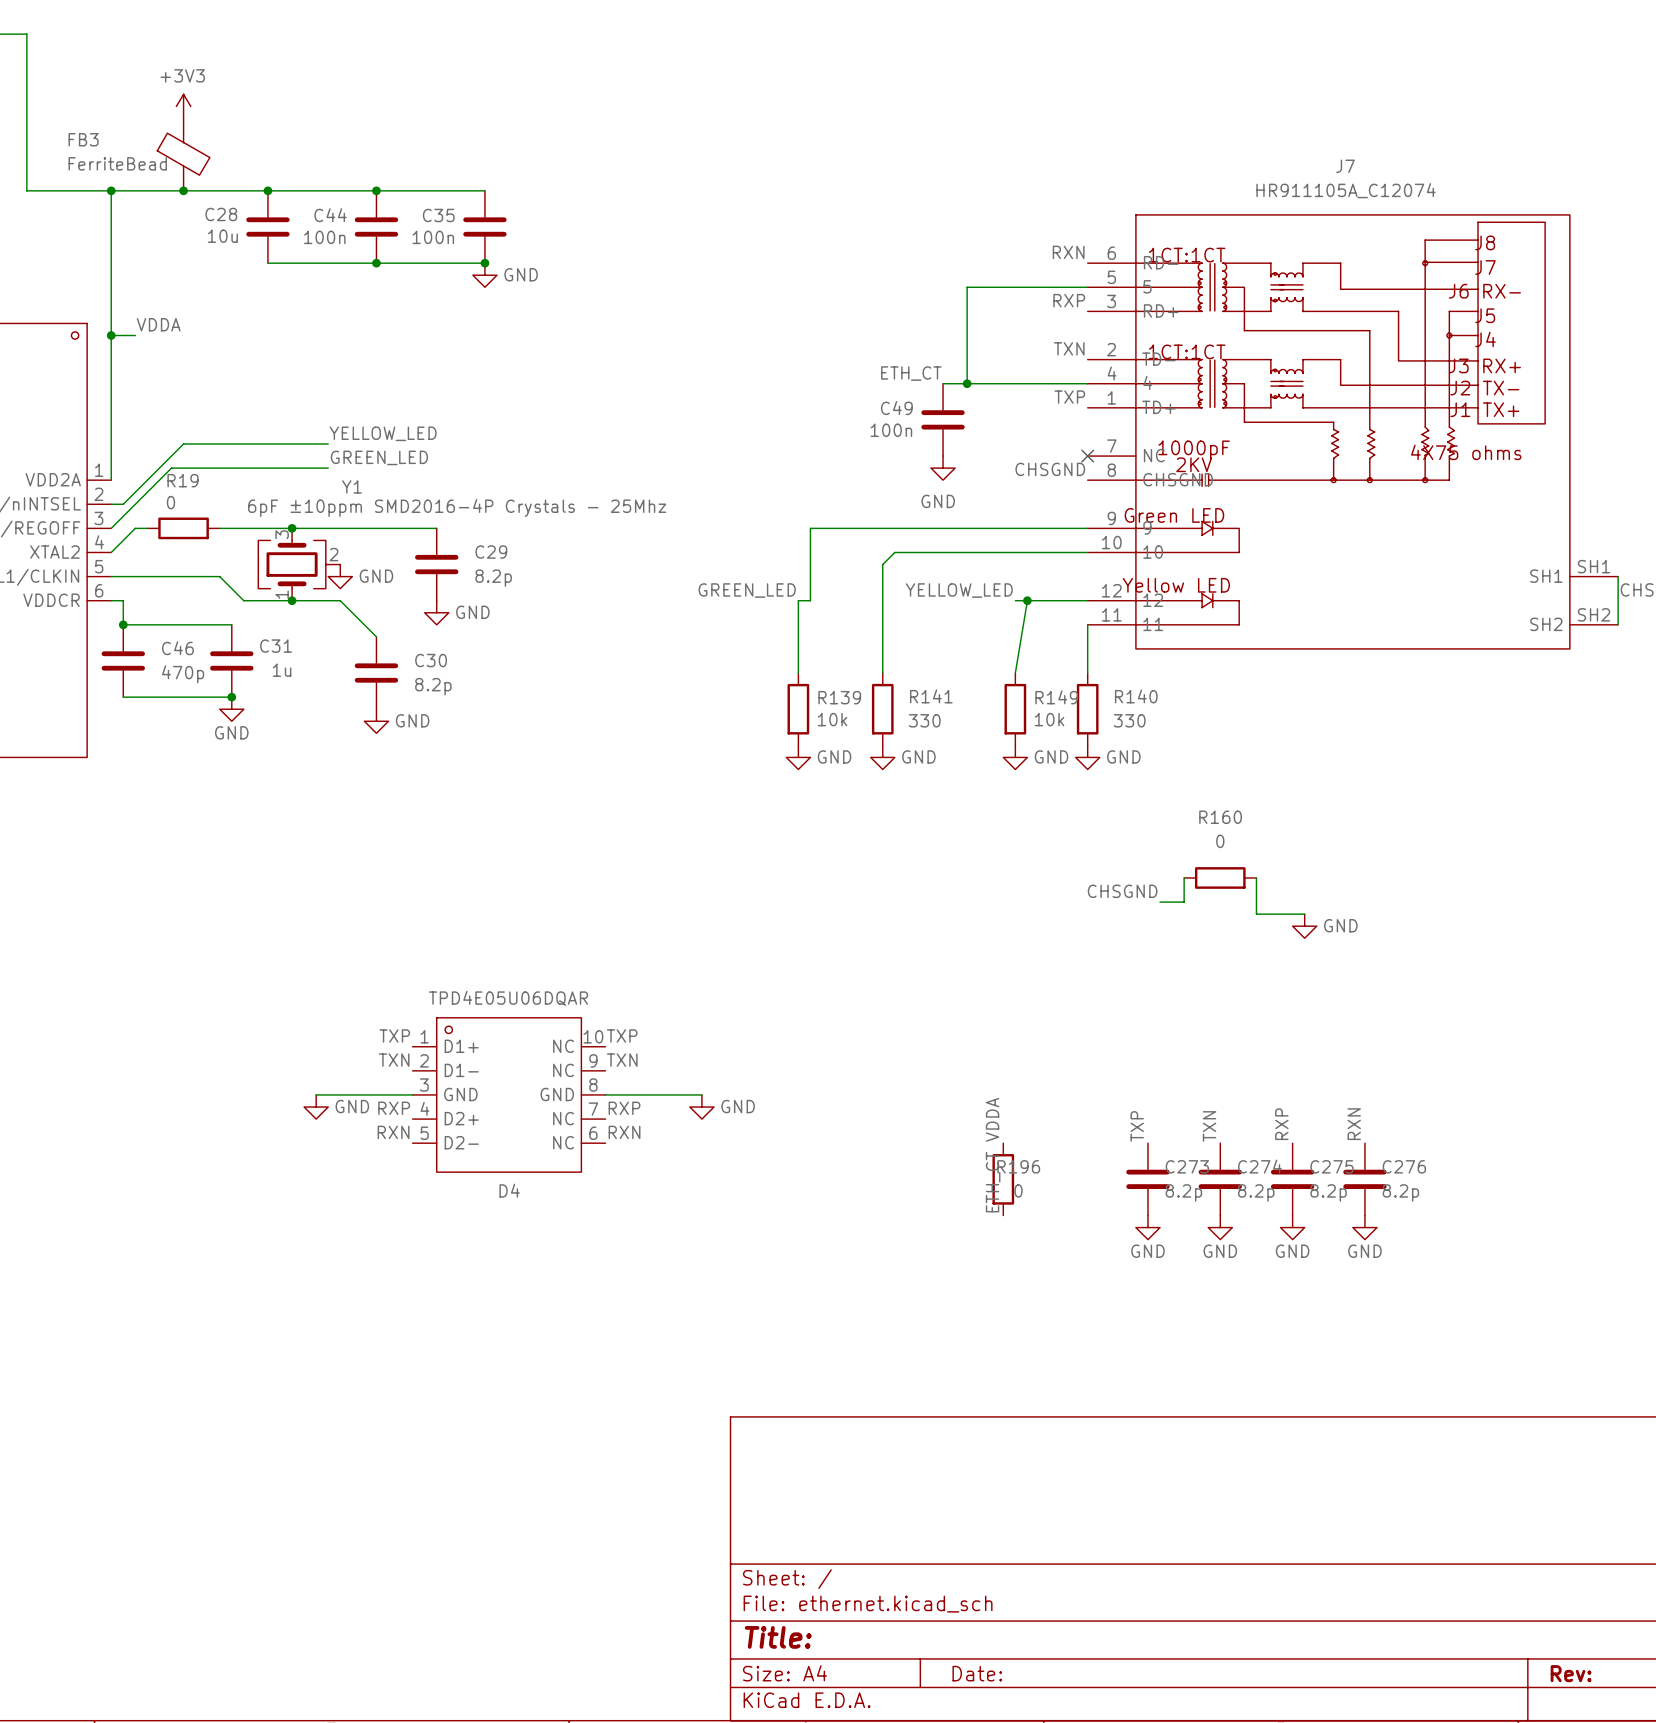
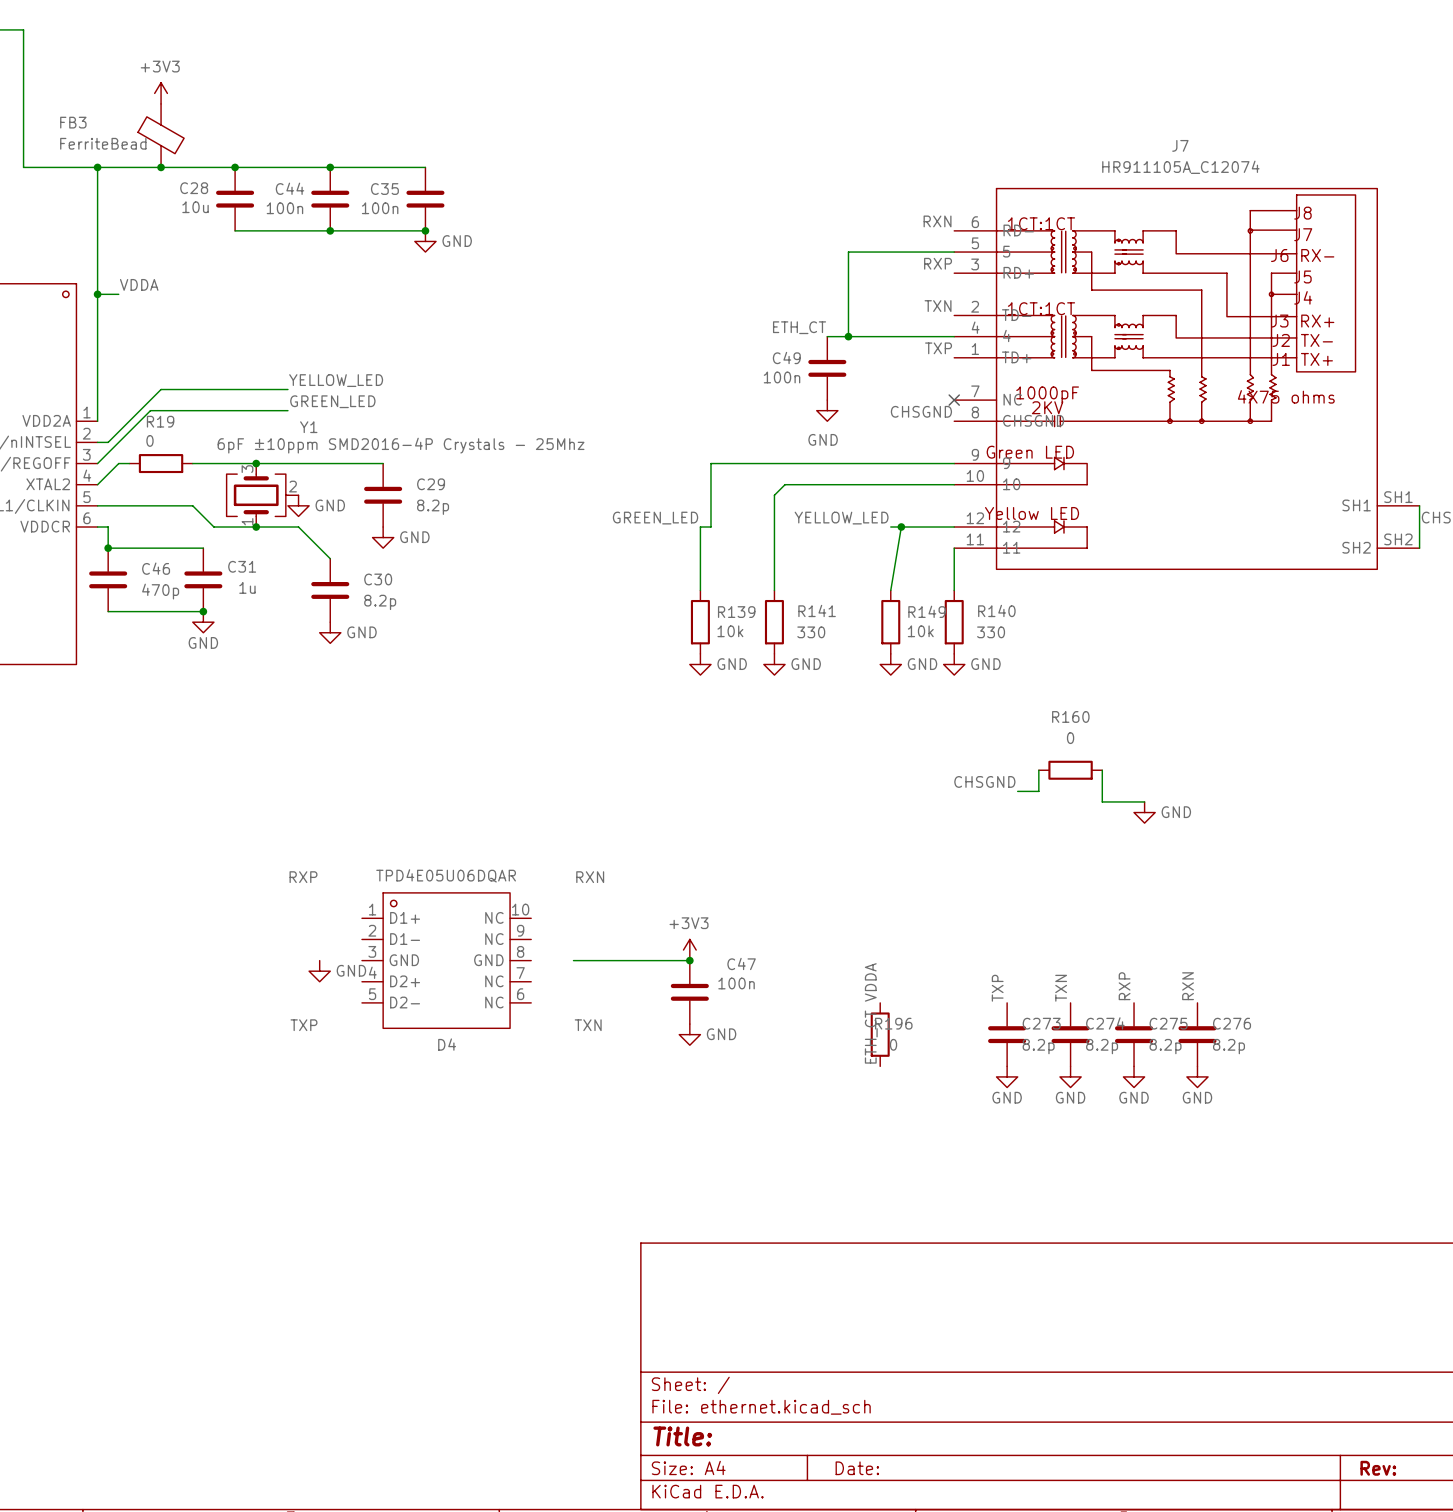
label: none -> RXN (590, 877)
label: TXP (394, 1035) -> none
label: TXP (622, 1035) -> none
label: TXN (394, 1060) -> none
label position: TXN (622, 1060) -> TXN (588, 1025)
power symbol: none -> +3V3 (689, 950)
wire: (316, 1094) (412, 1094) -> none
wire: (605, 1094) (653, 1094) -> none
wire: none -> (615, 960) (689, 960)
junction: none -> (689, 960)
power symbol position: GND (316, 1107) -> GND (319, 971)
power symbol position: GND (701, 1107) -> GND (689, 1034)
label position: RXP (394, 1108) -> RXP (303, 877)
label: RXP (624, 1108) -> none
C47: none -> 100n (689, 992)
label: RXN (393, 1132) -> none
label: RXN (624, 1132) -> none
label: none -> TXP (303, 1025)

